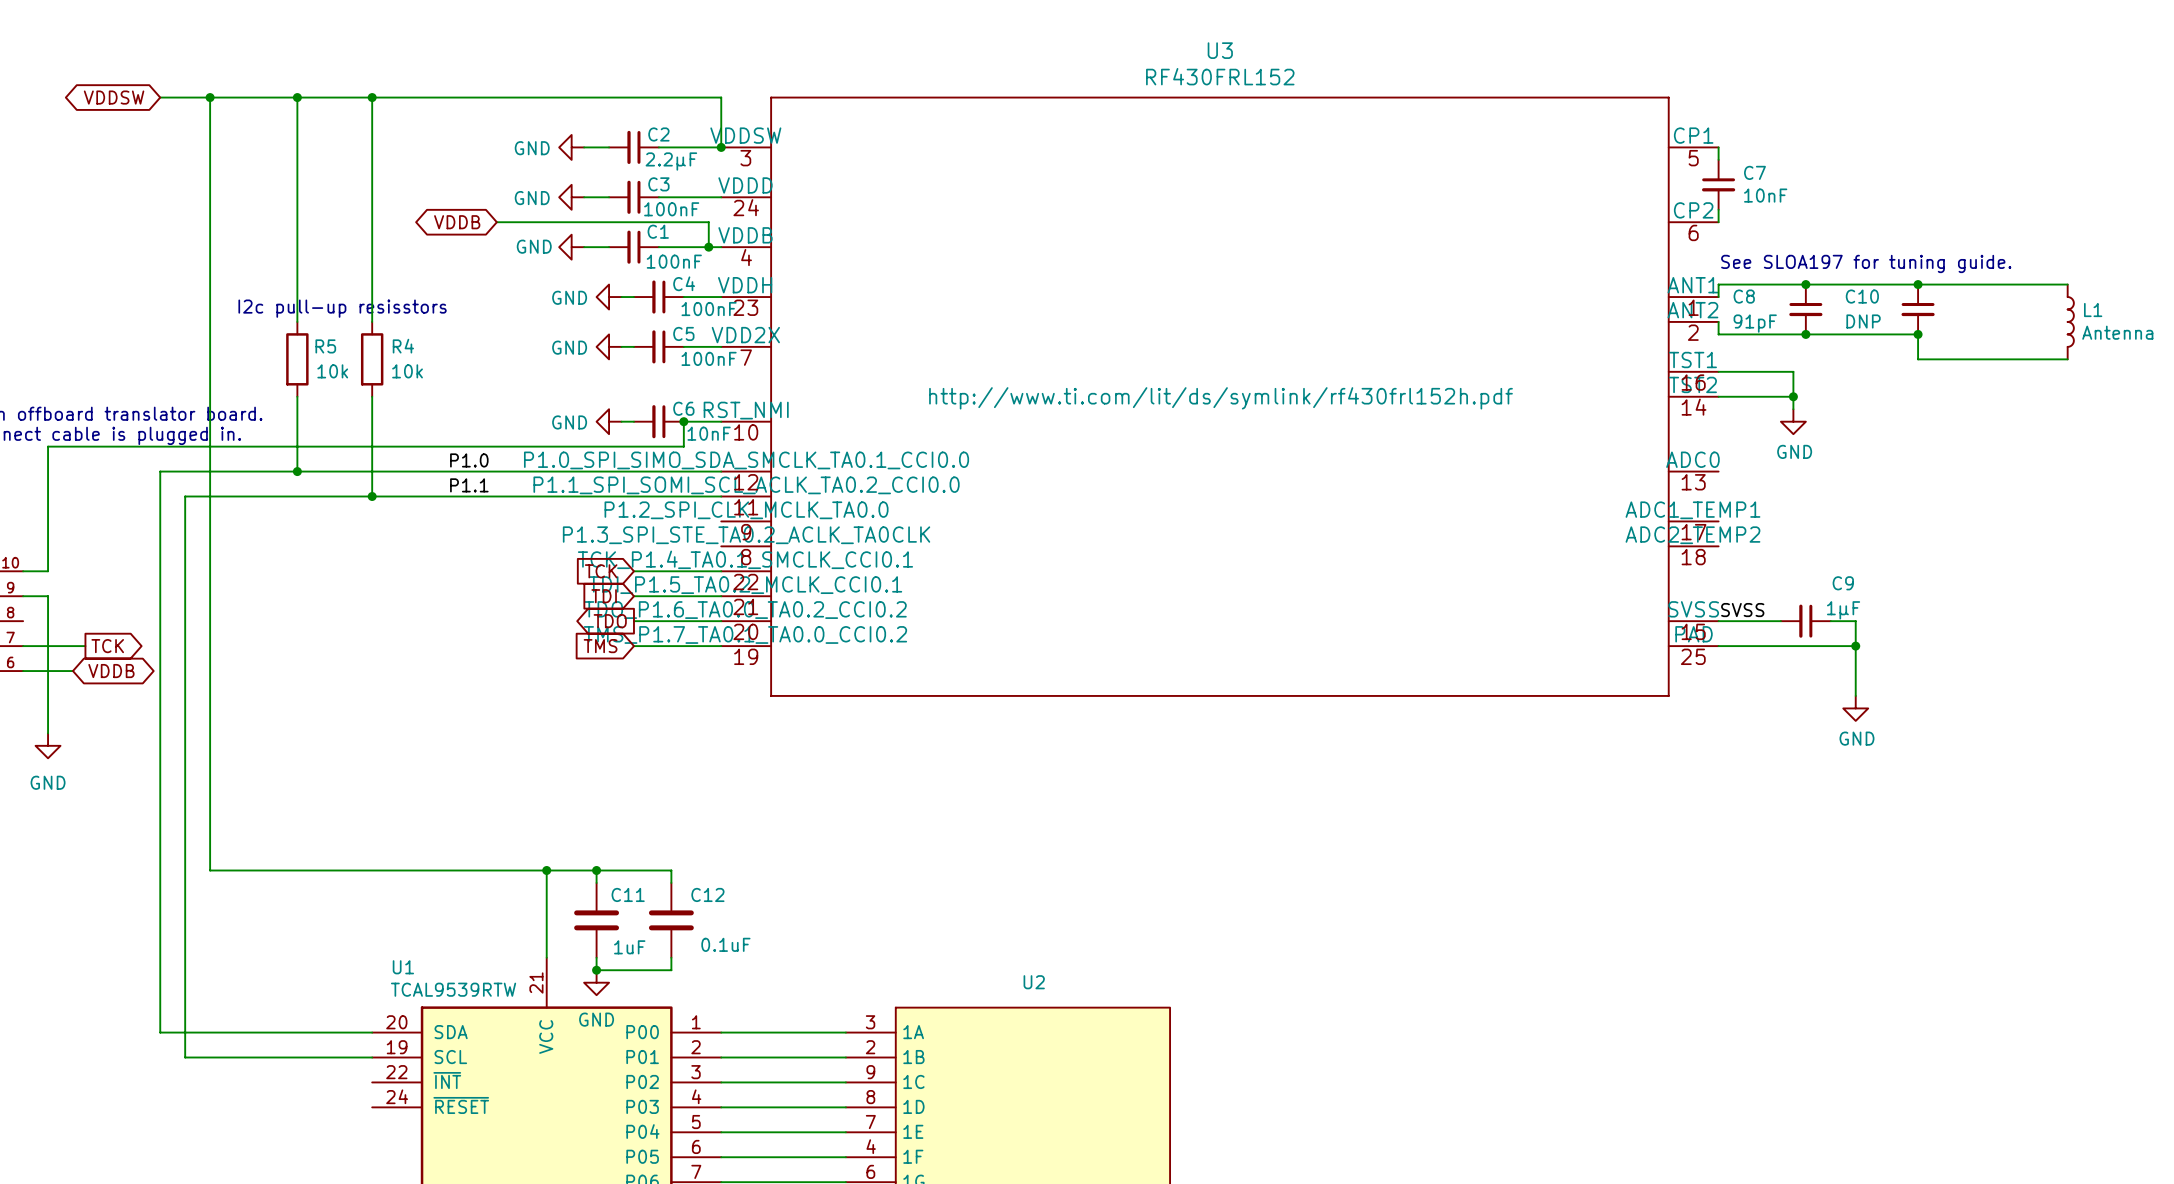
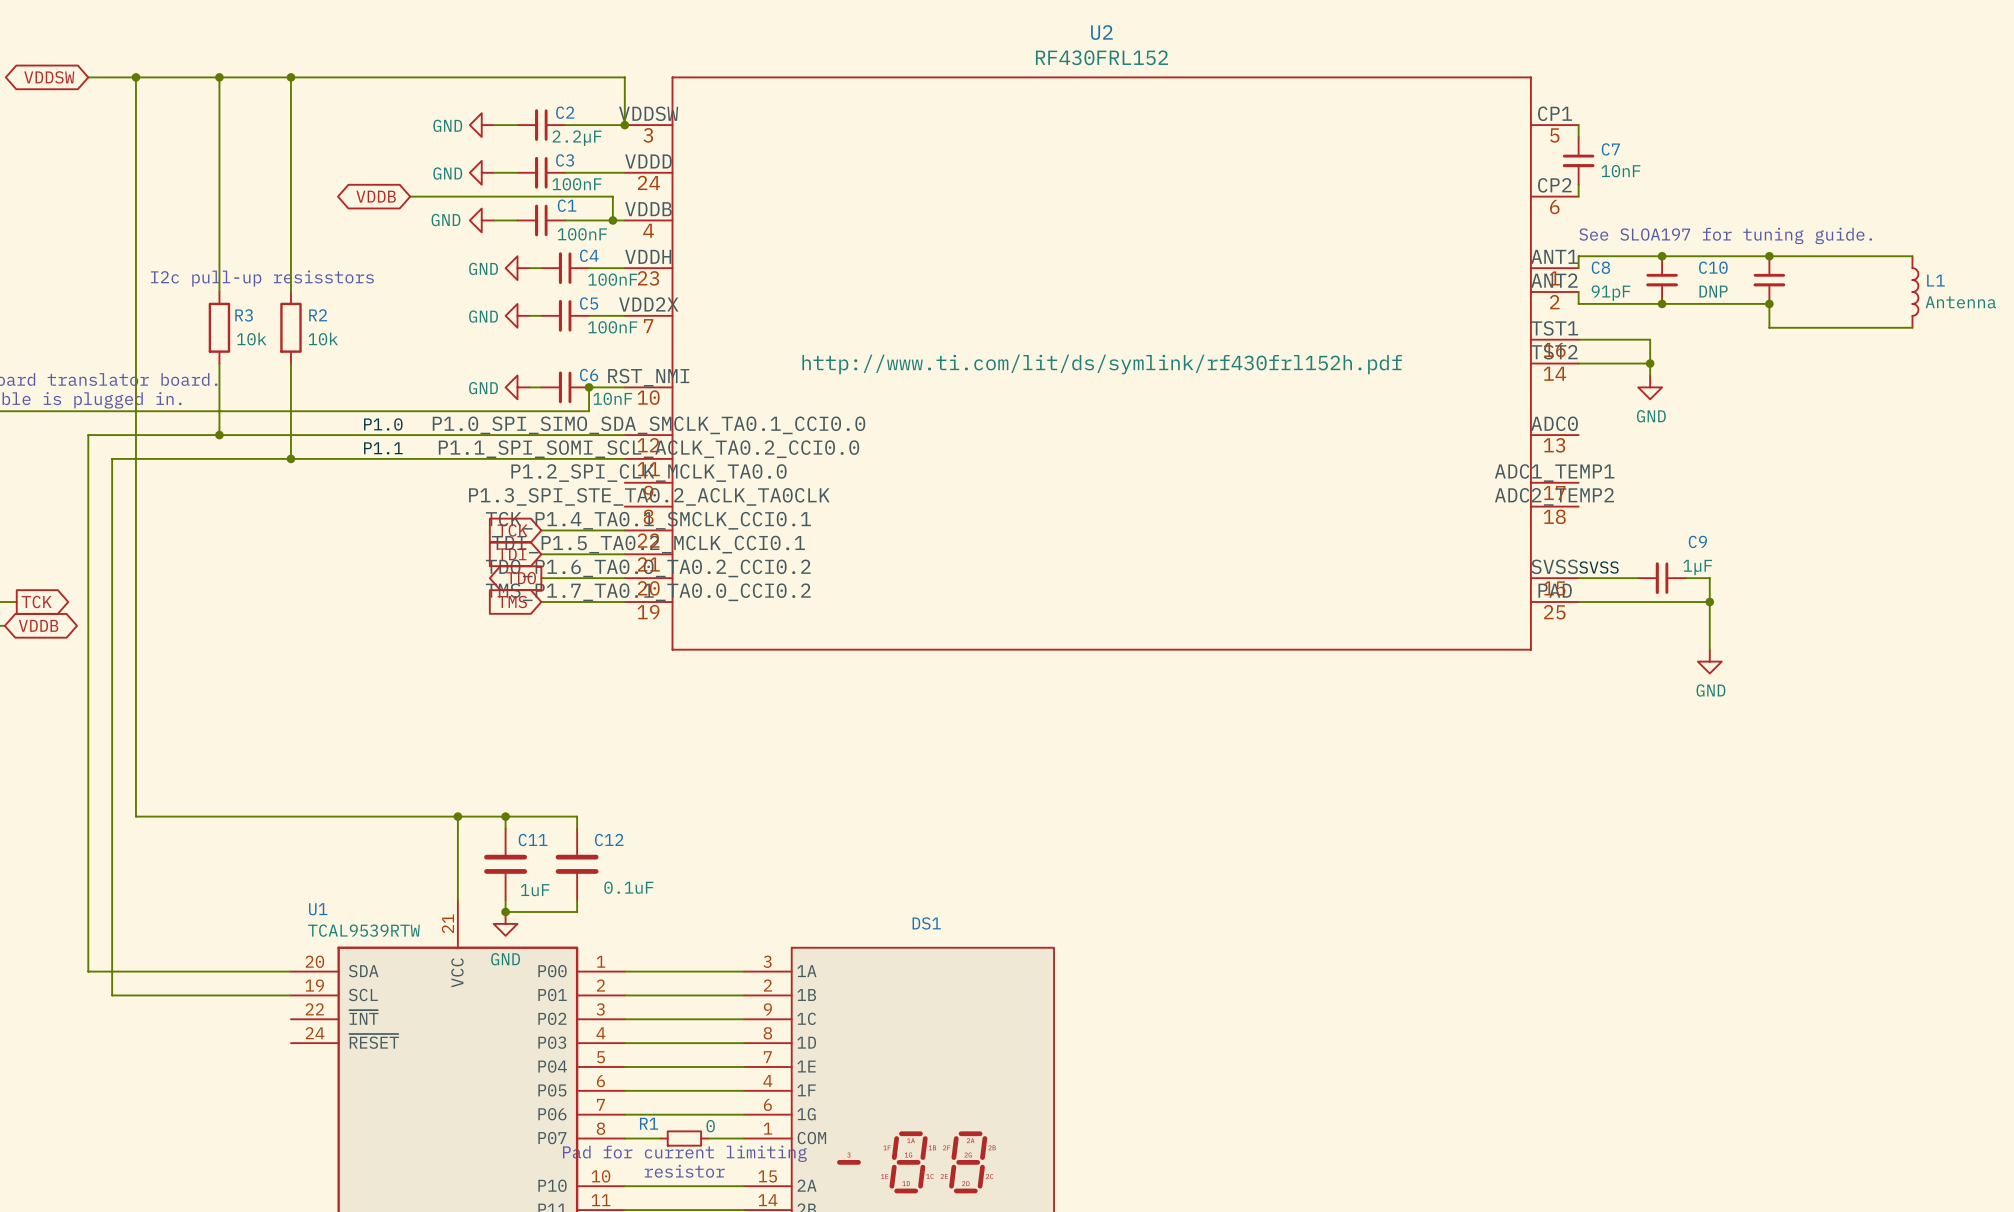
U3 name: U3 (1220, 50) -> U2 (1101, 32)
R5 name: R5 (325, 346) -> R3 (244, 315)
R4 name: R4 (403, 346) -> R2 (318, 315)
U2 name: U2 (1034, 982) -> DS1 (926, 923)

